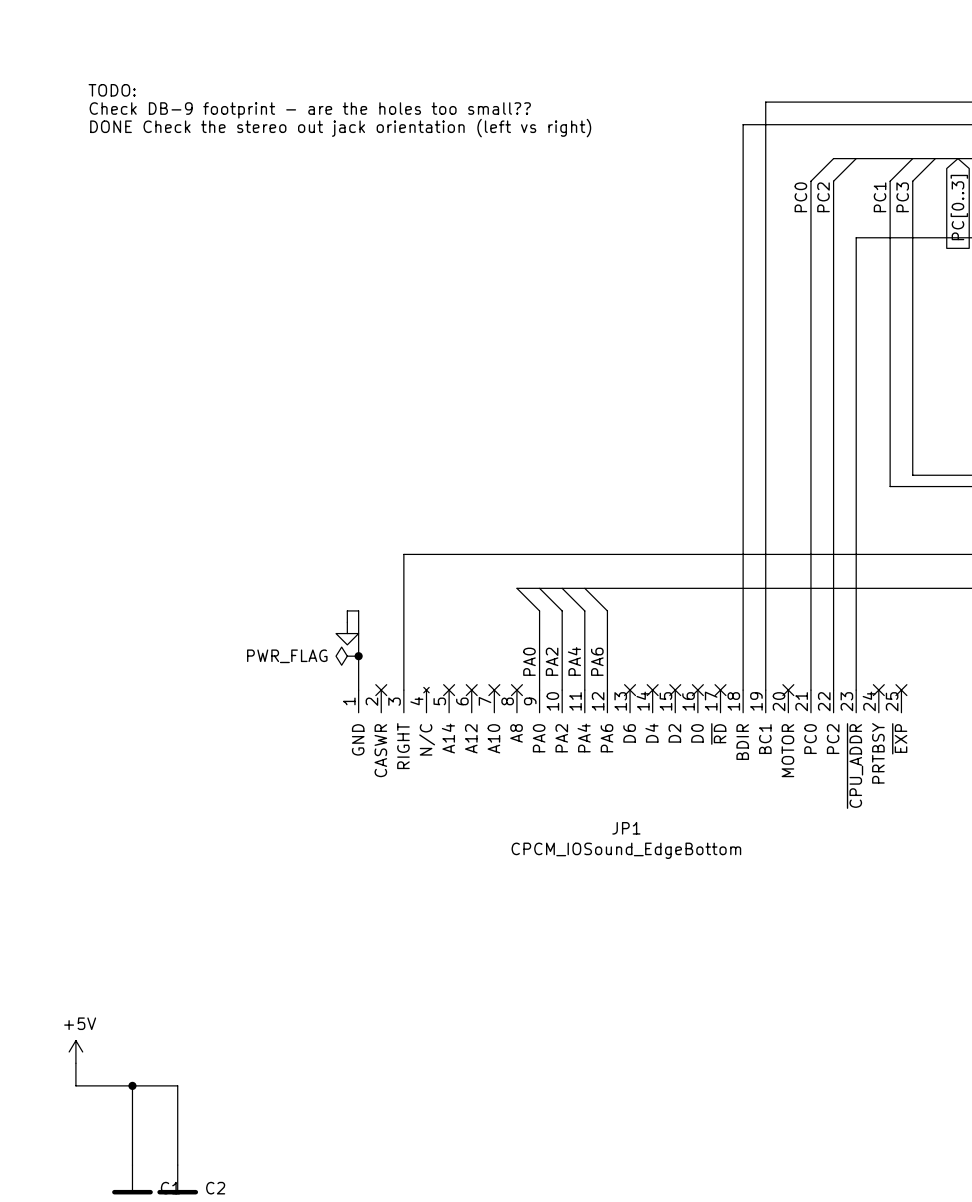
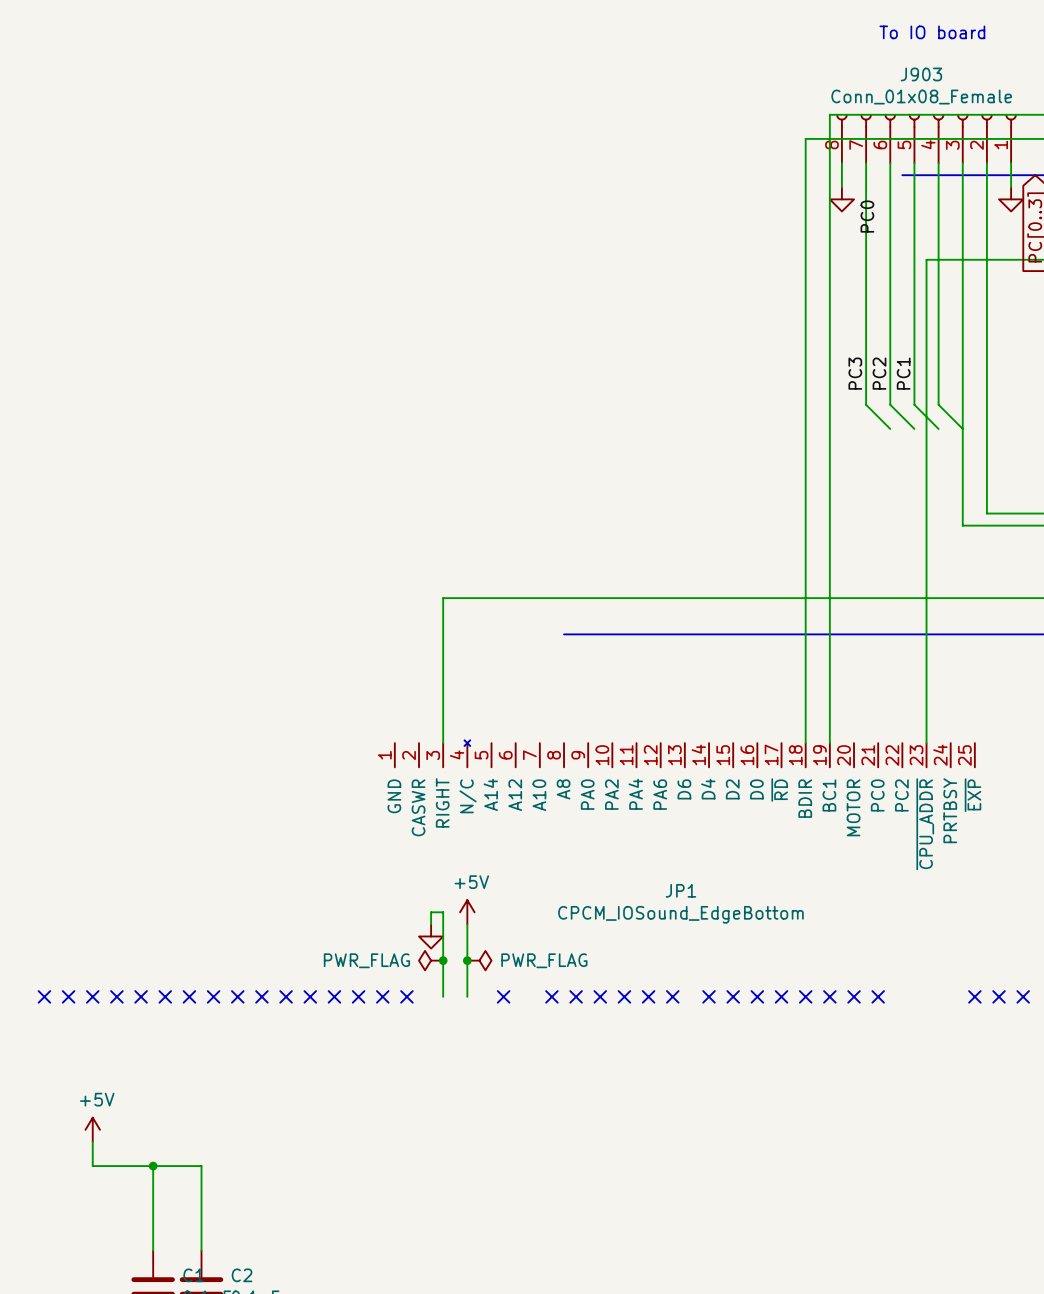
text: none -> To IO board (932, 32)
text: TODO: (112, 90) -> none
text: Check DB-9 footprint - are the holes too small?? (310, 110) -> none
J903: none -> Conn_01x08_Female (926, 138)
text: DONE Check the stereo out jack orientation (left vs right) (340, 128) -> none
wire: none -> (841, 163) (841, 187)
wire: none -> (866, 163) (866, 404) (890, 428)
wire: none -> (890, 163) (890, 404) (914, 428)
wire: none -> (914, 163) (914, 404) (938, 428)
wire: none -> (938, 163) (938, 404) (962, 428)
wire: none -> (1011, 163) (1011, 187)
wire: (833, 158) (810, 181) (810, 690) -> none
wire: (856, 158) (833, 181) (833, 690) -> none
wire: (912, 158) (890, 181) -> (962, 163) (962, 199)
wire: (935, 158) (912, 181) -> (986, 163) (986, 199)
power symbol: none -> (841, 199)
power symbol: none -> (1011, 199)
label position: PC2 (823, 197) -> PC2 (879, 373)
label position: PC1 (880, 197) -> PC1 (903, 373)
label position: PC3 (902, 197) -> PC3 (855, 373)
wire: (516, 588) (539, 610) (539, 690) -> none
wire: (539, 588) (562, 610) (562, 690) -> none
wire: (562, 588) (584, 610) (584, 690) -> none
wire: (584, 588) (607, 610) (607, 690) -> none
wire: (347, 622) (347, 610) (358, 610) (358, 690) -> none
power symbol: (347, 633) -> none
power symbol: PWR_FLAG (347, 656) -> none
junction: (358, 656) -> none
label: PA0 (529, 661) -> none
label: PA2 (552, 661) -> none
label: PA4 (574, 661) -> none
label: PA6 (597, 661) -> none
no-connect mark: (381, 690) -> none
no-connect mark: (449, 690) -> none
no-connect mark: (471, 690) -> none
no-connect mark: (494, 690) -> none
no-connect mark: (516, 690) -> none
no-connect mark: (630, 690) -> none
no-connect mark: (652, 690) -> none
no-connect mark: (675, 690) -> none
no-connect mark: (697, 690) -> none
no-connect mark: (720, 690) -> none
no-connect mark: (788, 690) -> none
no-connect mark: (878, 690) -> none
no-connect mark: (901, 690) -> none
power symbol: none -> +5V (467, 912)
wire: none -> (431, 924) (431, 912) (443, 912) (443, 996)
wire: none -> (467, 924) (467, 996)
power symbol: none -> (431, 936)
power symbol: none -> PWR_FLAG (431, 960)
junction: none -> (443, 960)
junction: none -> (467, 960)
power symbol: none -> PWR_FLAG (479, 960)
no-connect mark: none -> (44, 996)
no-connect mark: none -> (68, 996)
no-connect mark: none -> (92, 996)
no-connect mark: none -> (116, 996)
no-connect mark: none -> (141, 996)
no-connect mark: none -> (165, 996)
no-connect mark: none -> (189, 996)
no-connect mark: none -> (213, 996)
no-connect mark: none -> (237, 996)
no-connect mark: none -> (261, 996)
no-connect mark: none -> (286, 996)
no-connect mark: none -> (310, 996)
no-connect mark: none -> (334, 996)
no-connect mark: none -> (358, 996)
no-connect mark: none -> (382, 996)
no-connect mark: none -> (406, 996)
no-connect mark: none -> (503, 996)
no-connect mark: none -> (551, 996)
no-connect mark: none -> (576, 996)
no-connect mark: none -> (600, 996)
no-connect mark: none -> (624, 996)
no-connect mark: none -> (648, 996)
no-connect mark: none -> (672, 996)
no-connect mark: none -> (709, 996)
no-connect mark: none -> (733, 996)
no-connect mark: none -> (757, 996)
no-connect mark: none -> (781, 996)
no-connect mark: none -> (805, 996)
no-connect mark: none -> (829, 996)
no-connect mark: none -> (854, 996)
no-connect mark: none -> (878, 996)
no-connect mark: none -> (974, 996)
no-connect mark: none -> (999, 996)
no-connect mark: none -> (1023, 996)

